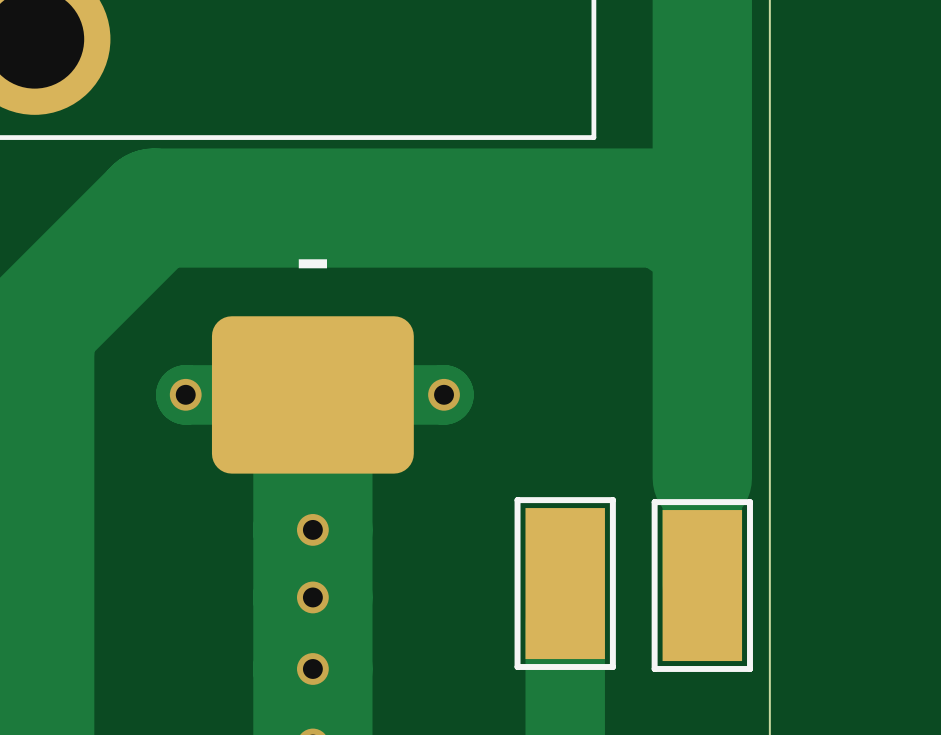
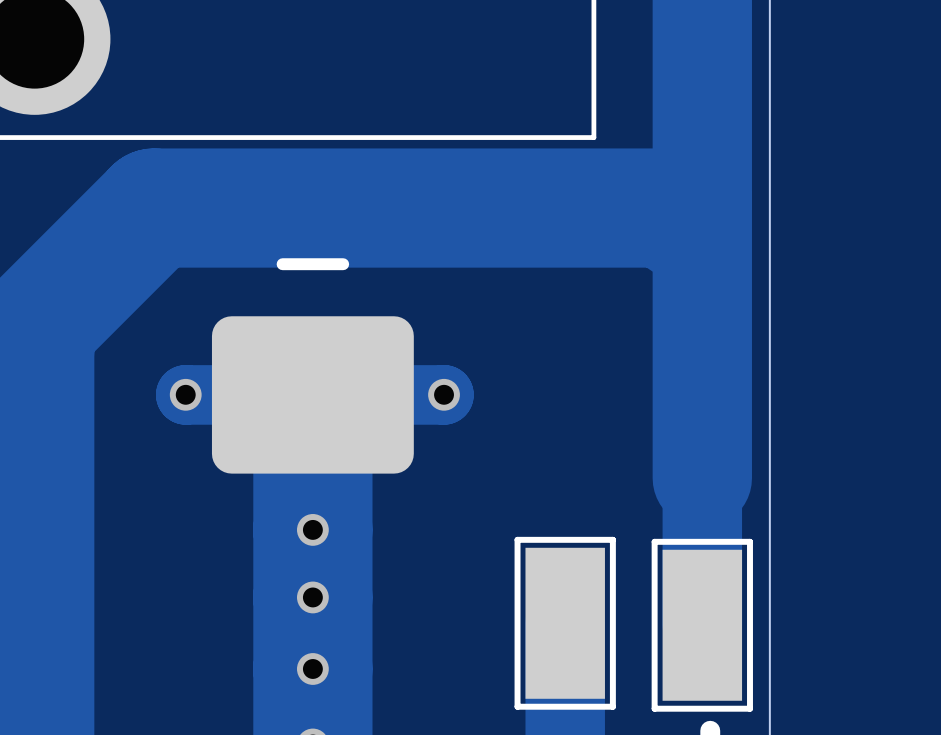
part position: (565, 583) -> (565, 623)
part position: (702, 585) -> (702, 625)

